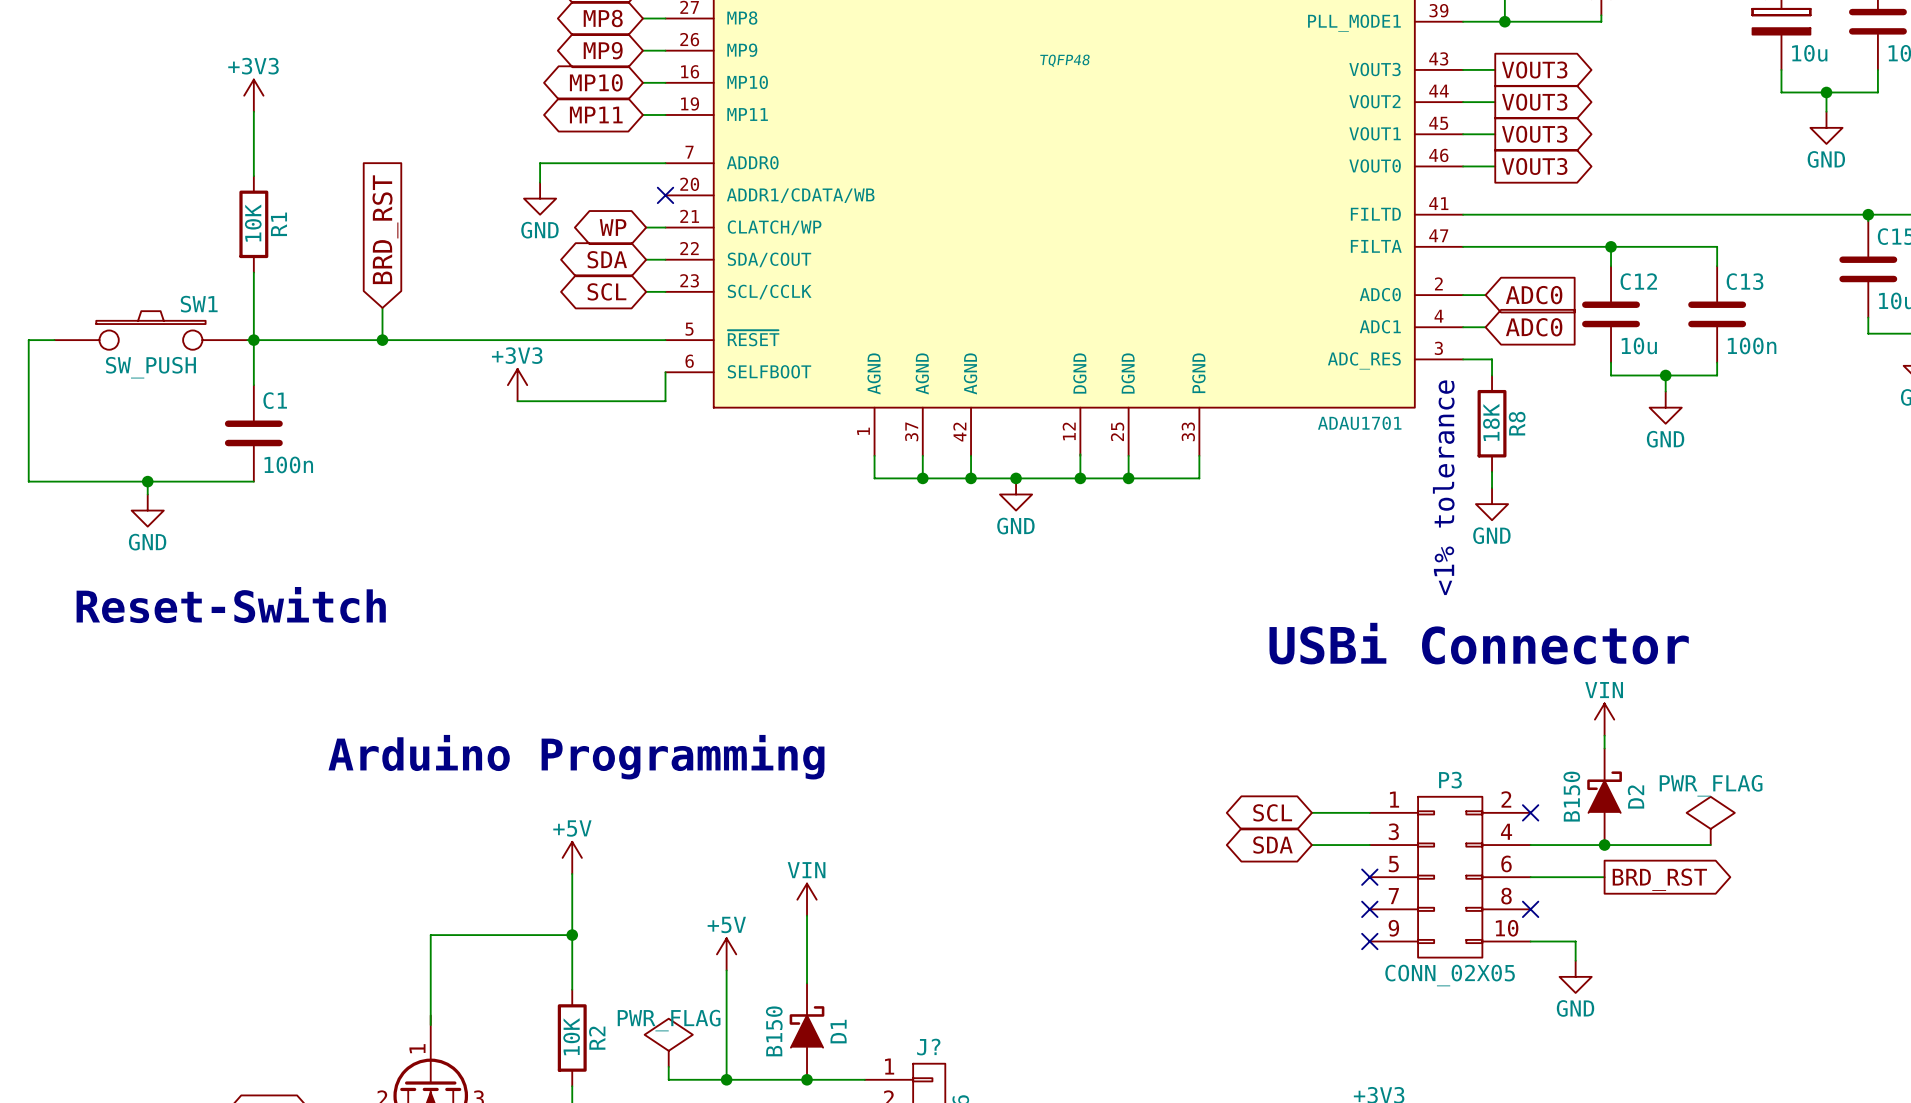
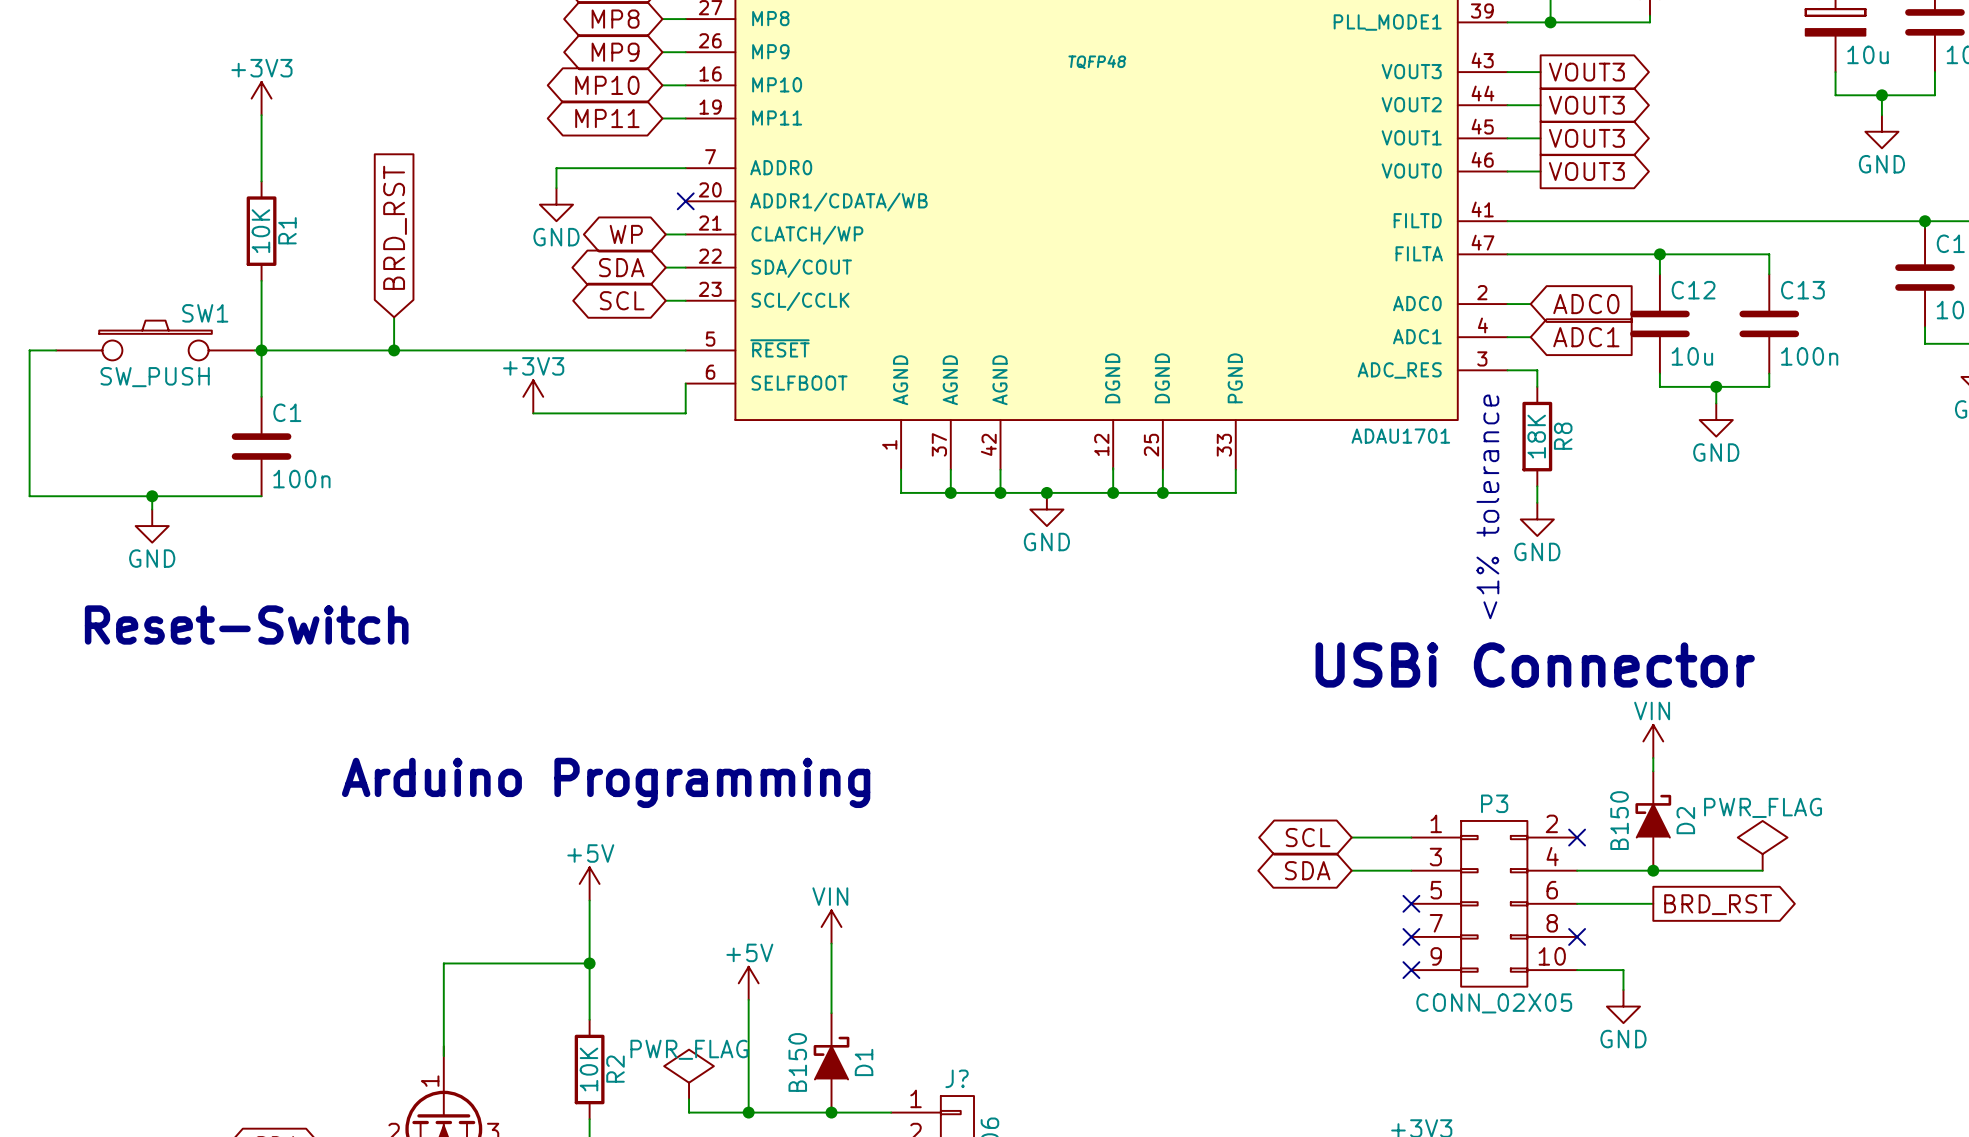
global label: ADC0 (1534, 327) -> ADC1 (1586, 337)

